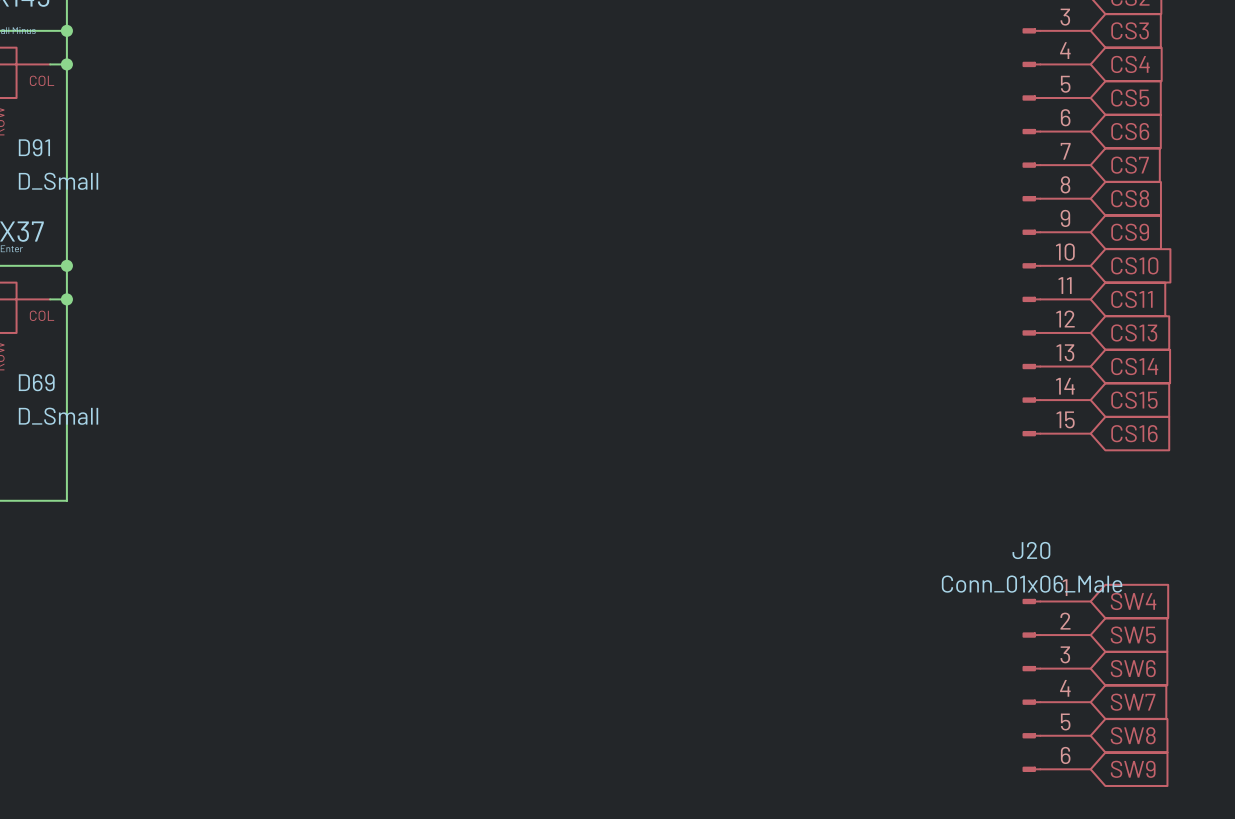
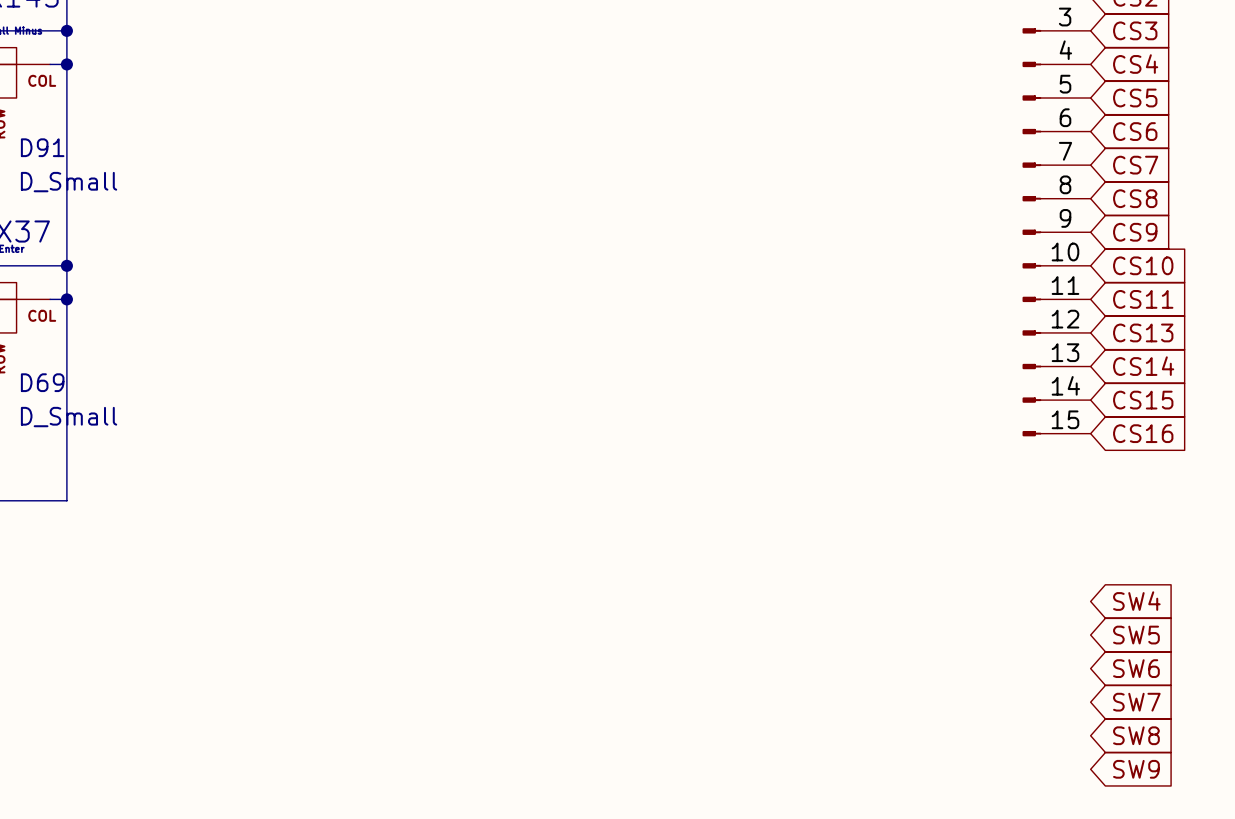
J20: Conn_01x06_Male (1056, 685) -> none

